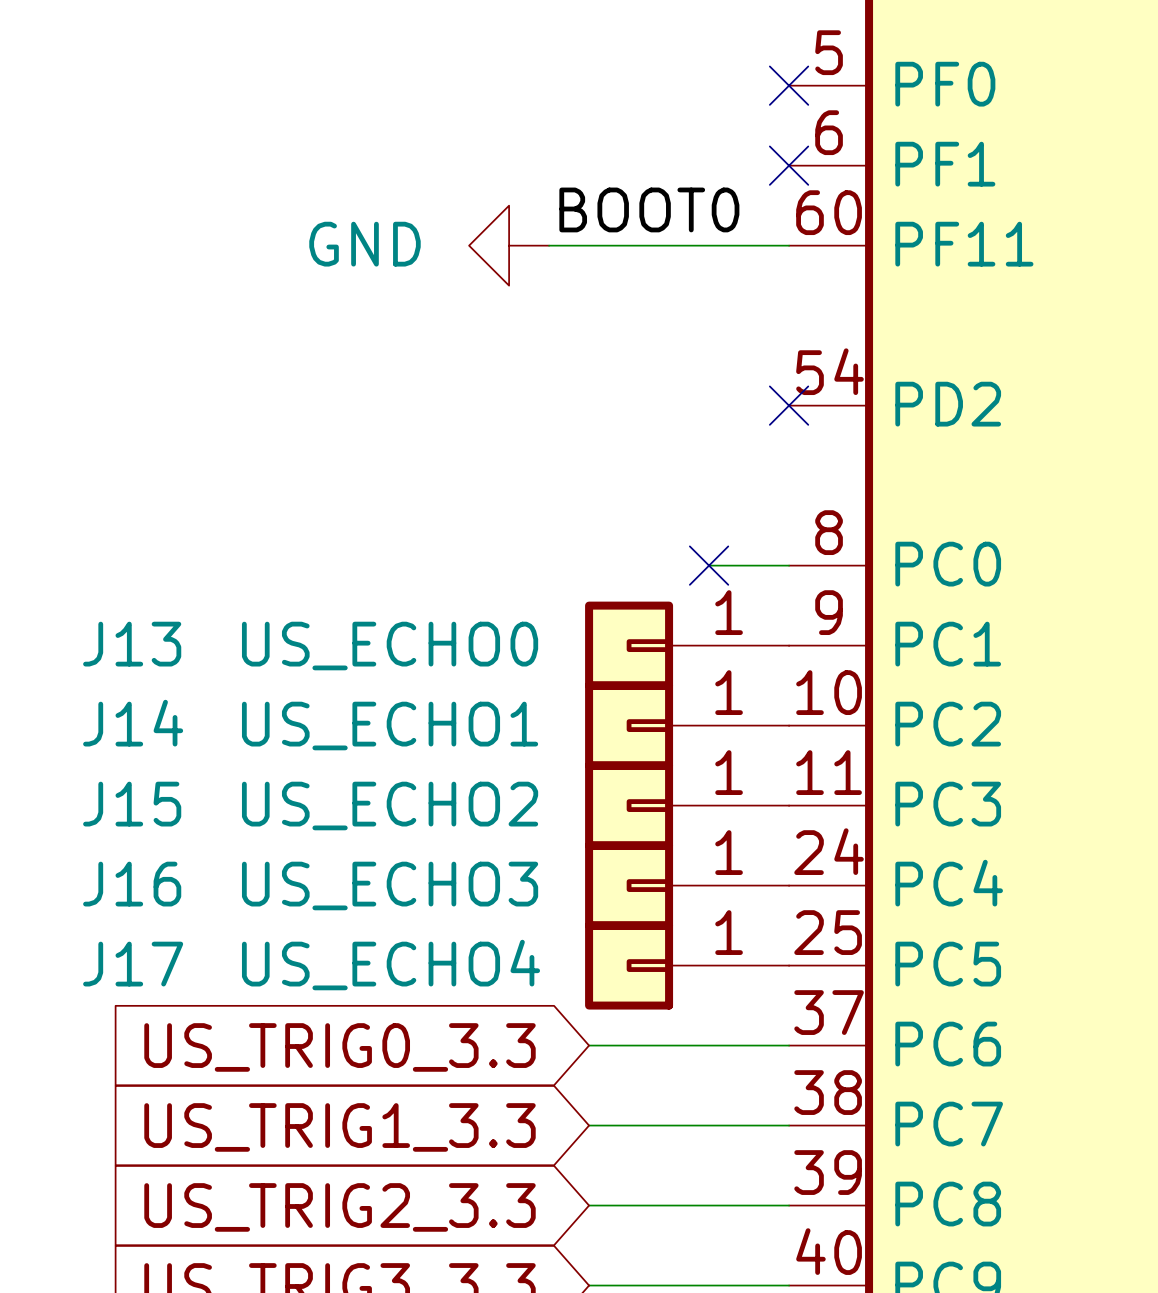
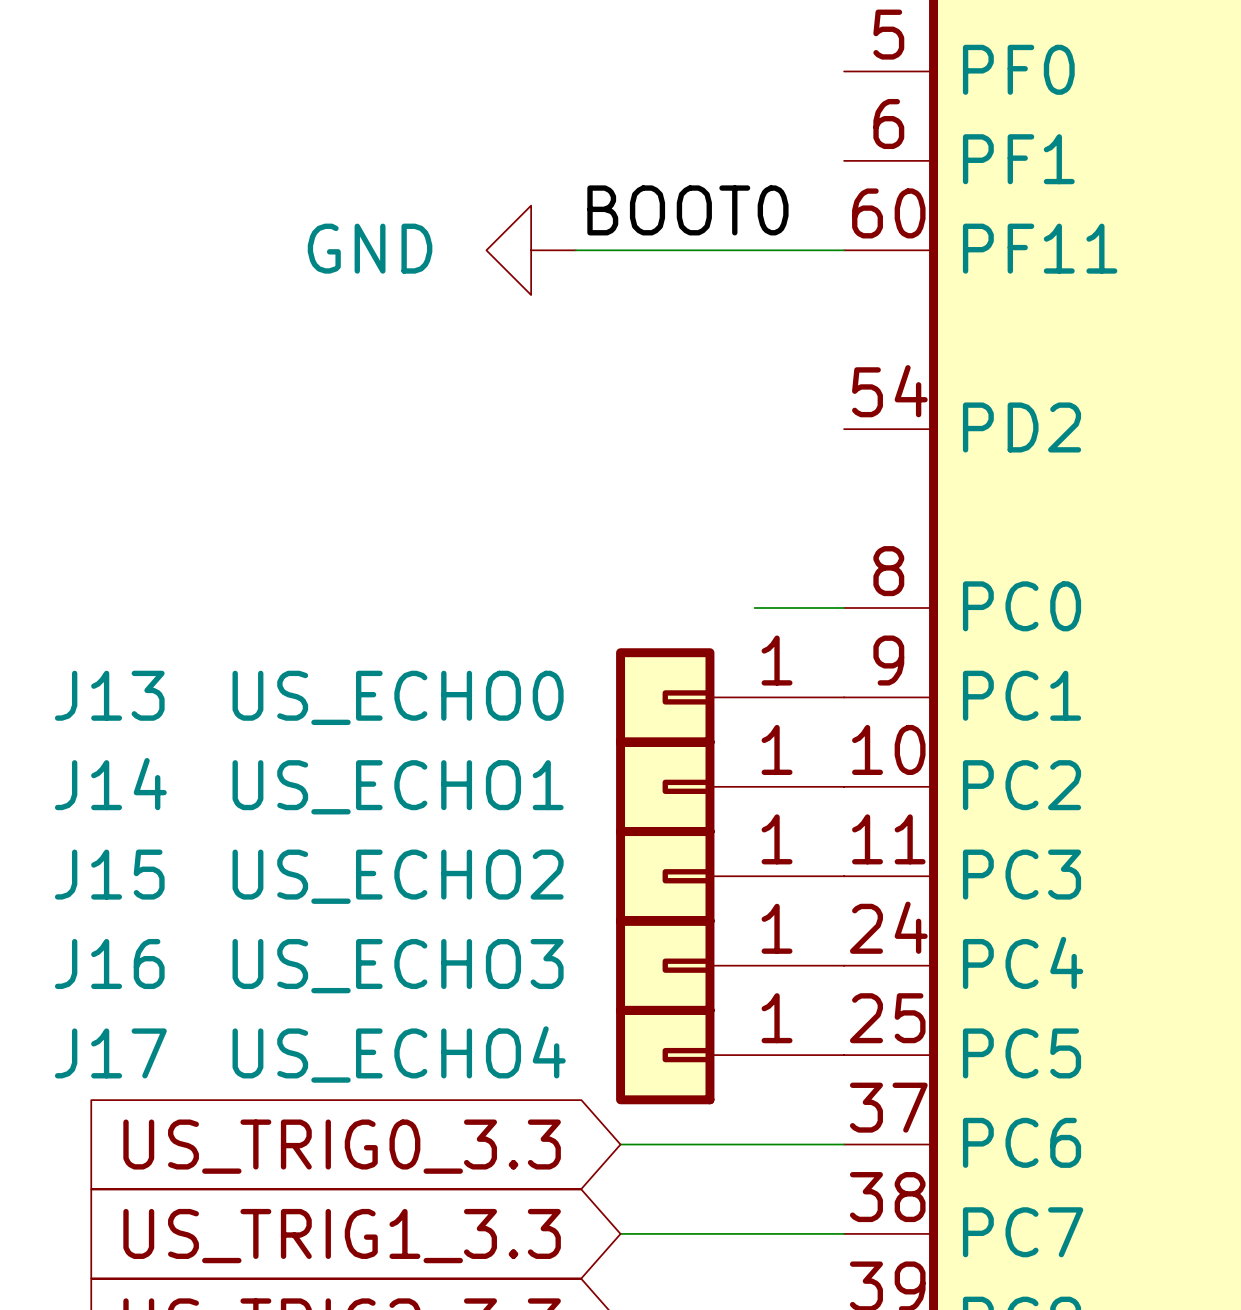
no-connect mark: (789, 85) -> none
no-connect mark: (789, 165) -> none
no-connect mark: (789, 405) -> none
no-connect mark: (709, 565) -> none

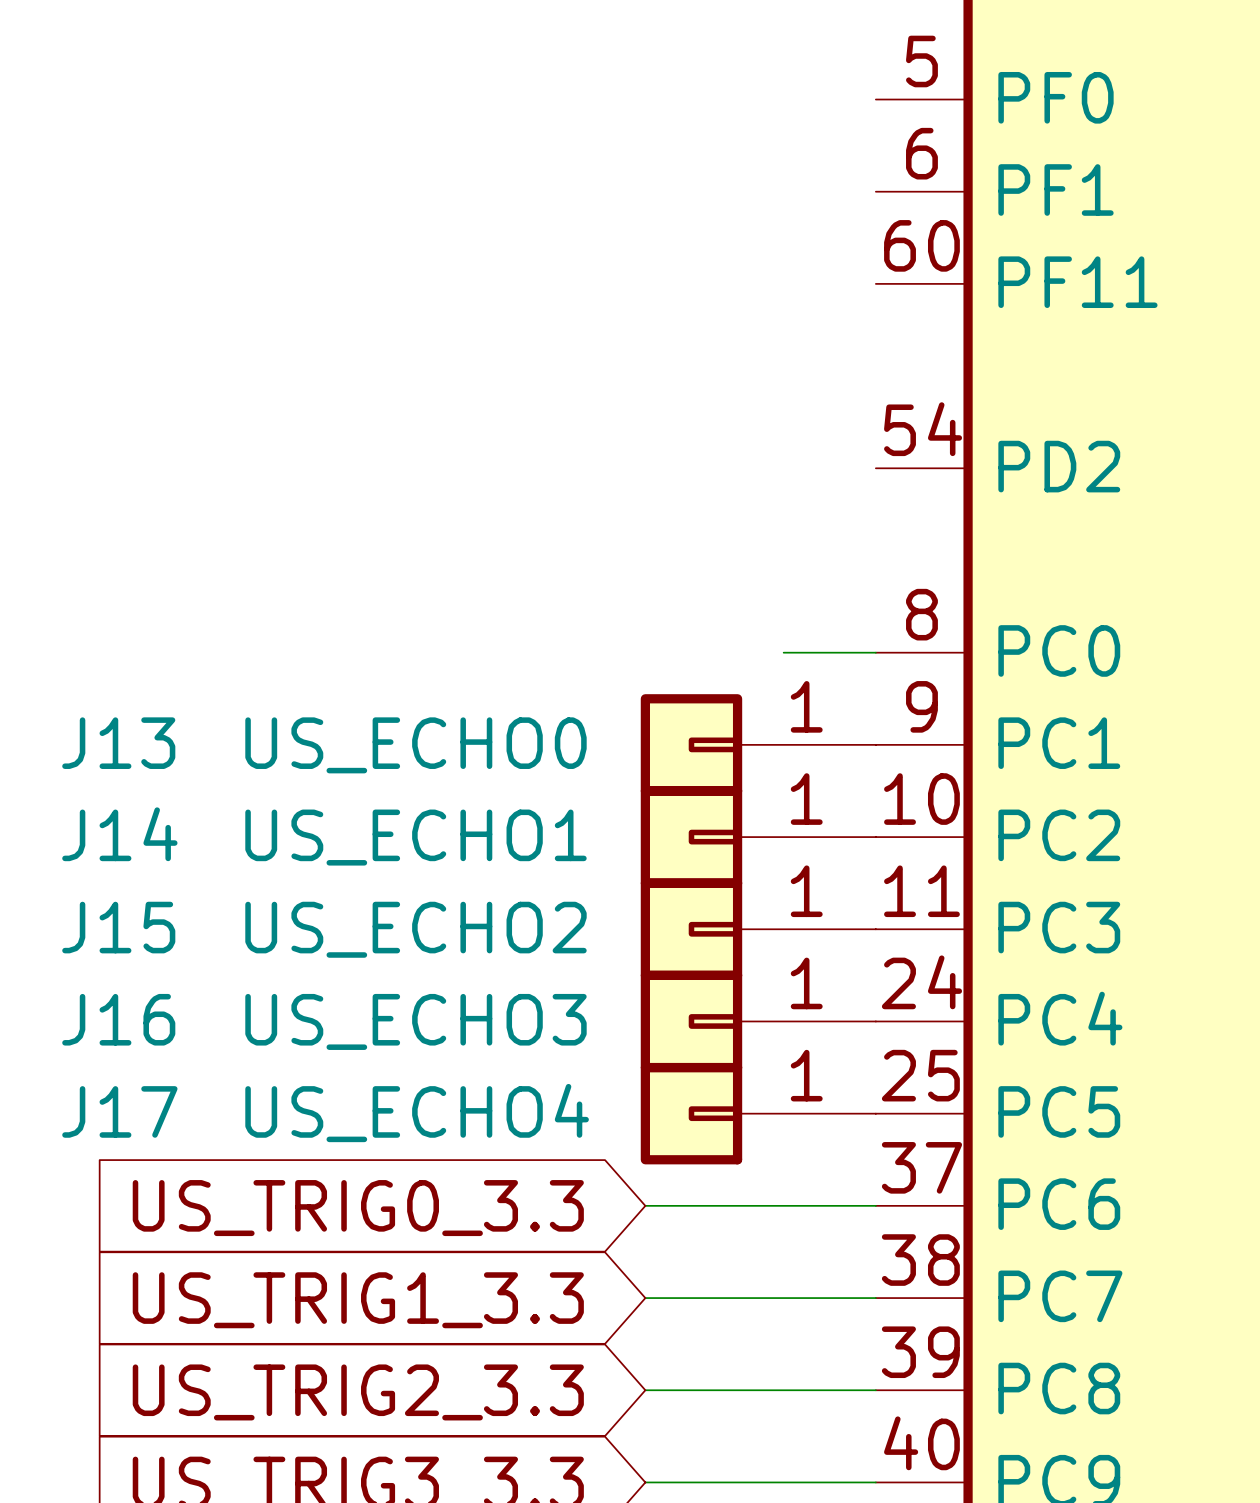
label: BOOT0 (687, 210) -> none
power symbol: GND (531, 250) -> none
wire: (575, 250) (844, 250) -> none

